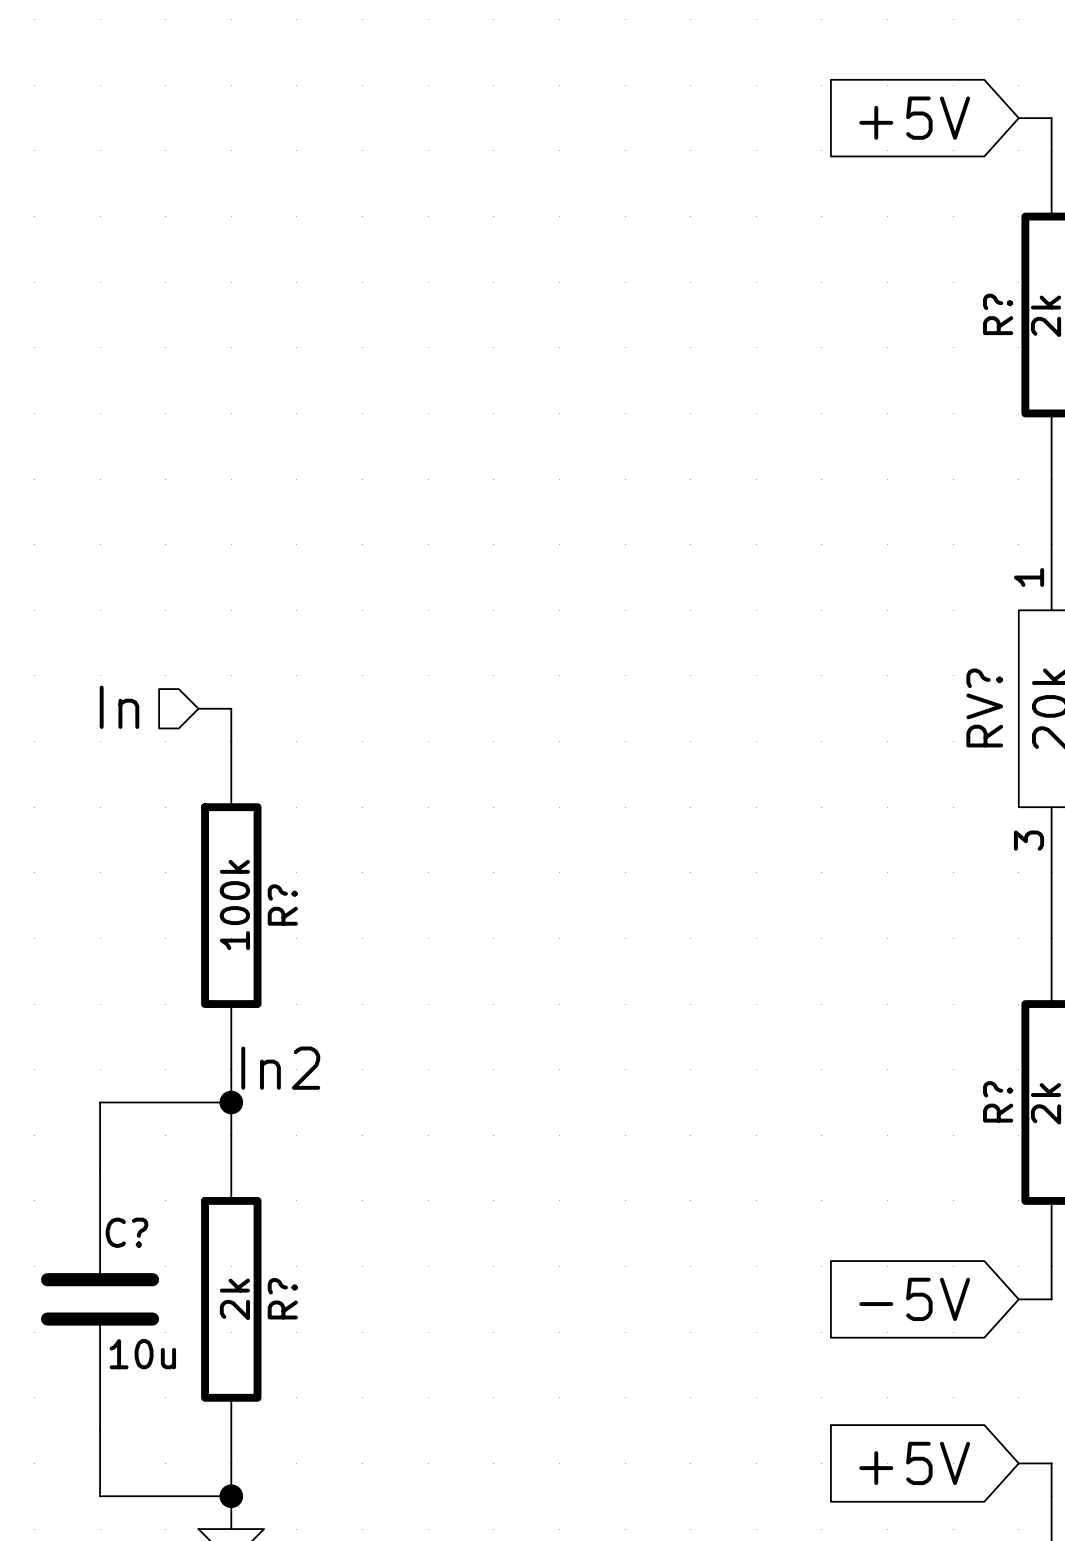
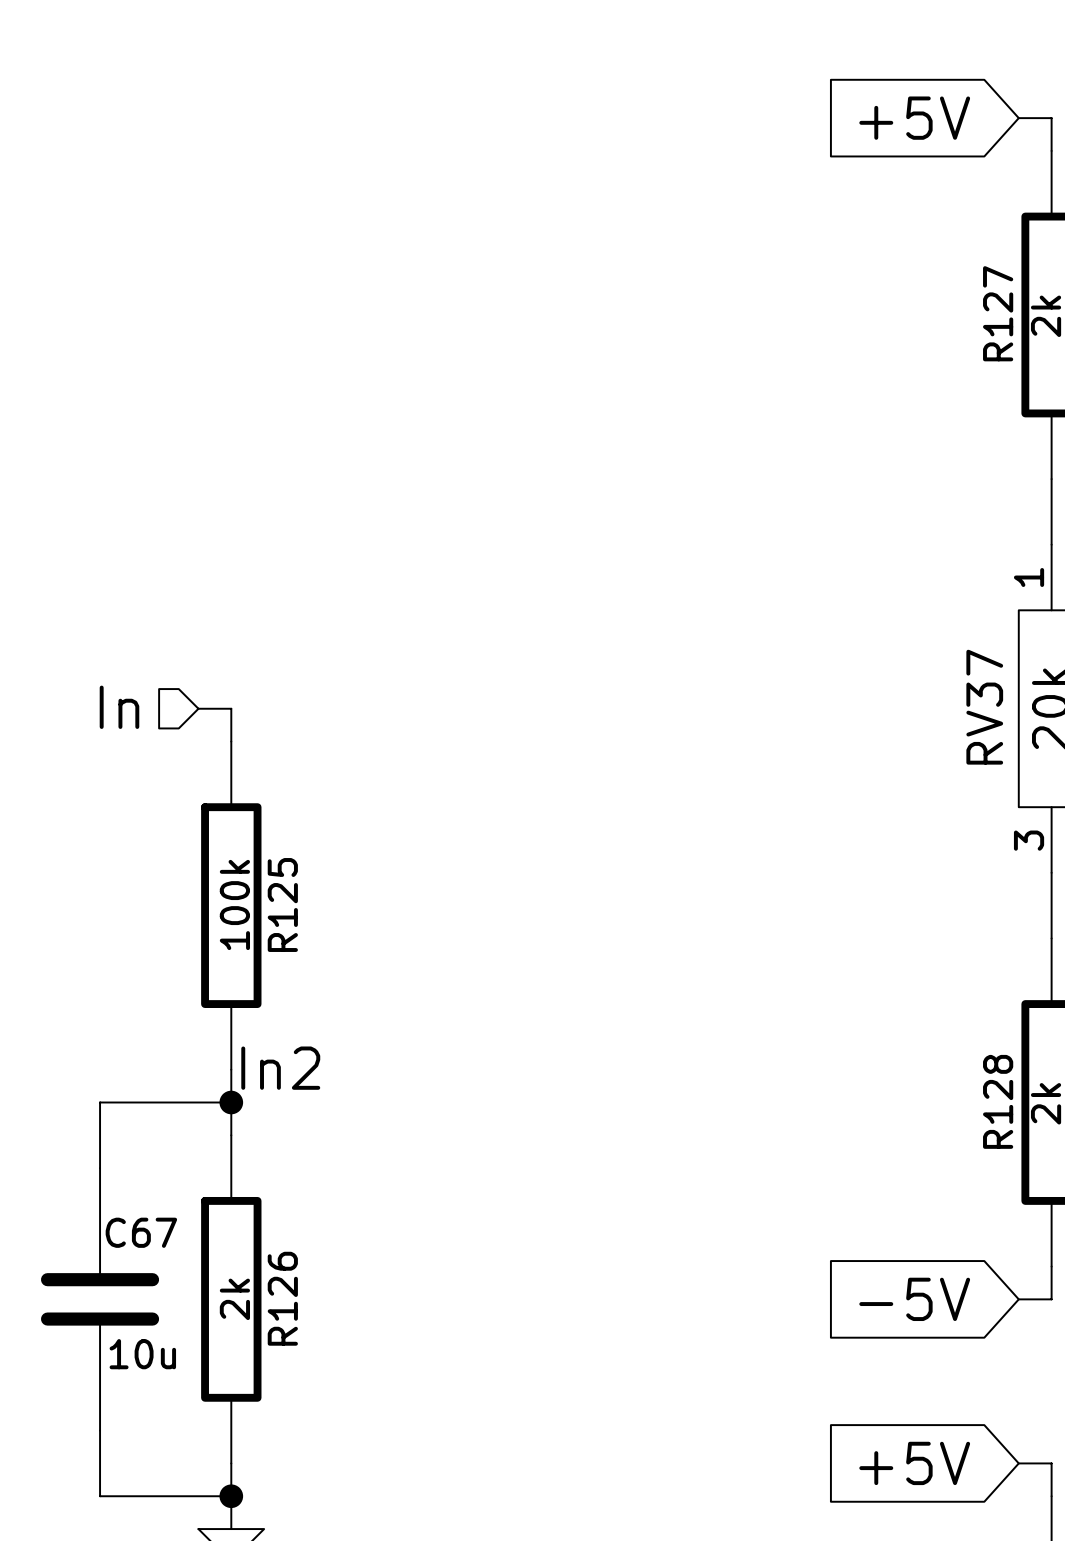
R? name: R? (998, 314) -> R127 (998, 313)
RV? name: RV? (984, 707) -> RV37 (984, 707)
R? name: R? (282, 905) -> R125 (282, 905)
R? name: R? (998, 1101) -> R128 (998, 1101)
C? name: C? (127, 1232) -> C67 (141, 1232)
R? name: R? (282, 1298) -> R126 (282, 1298)

